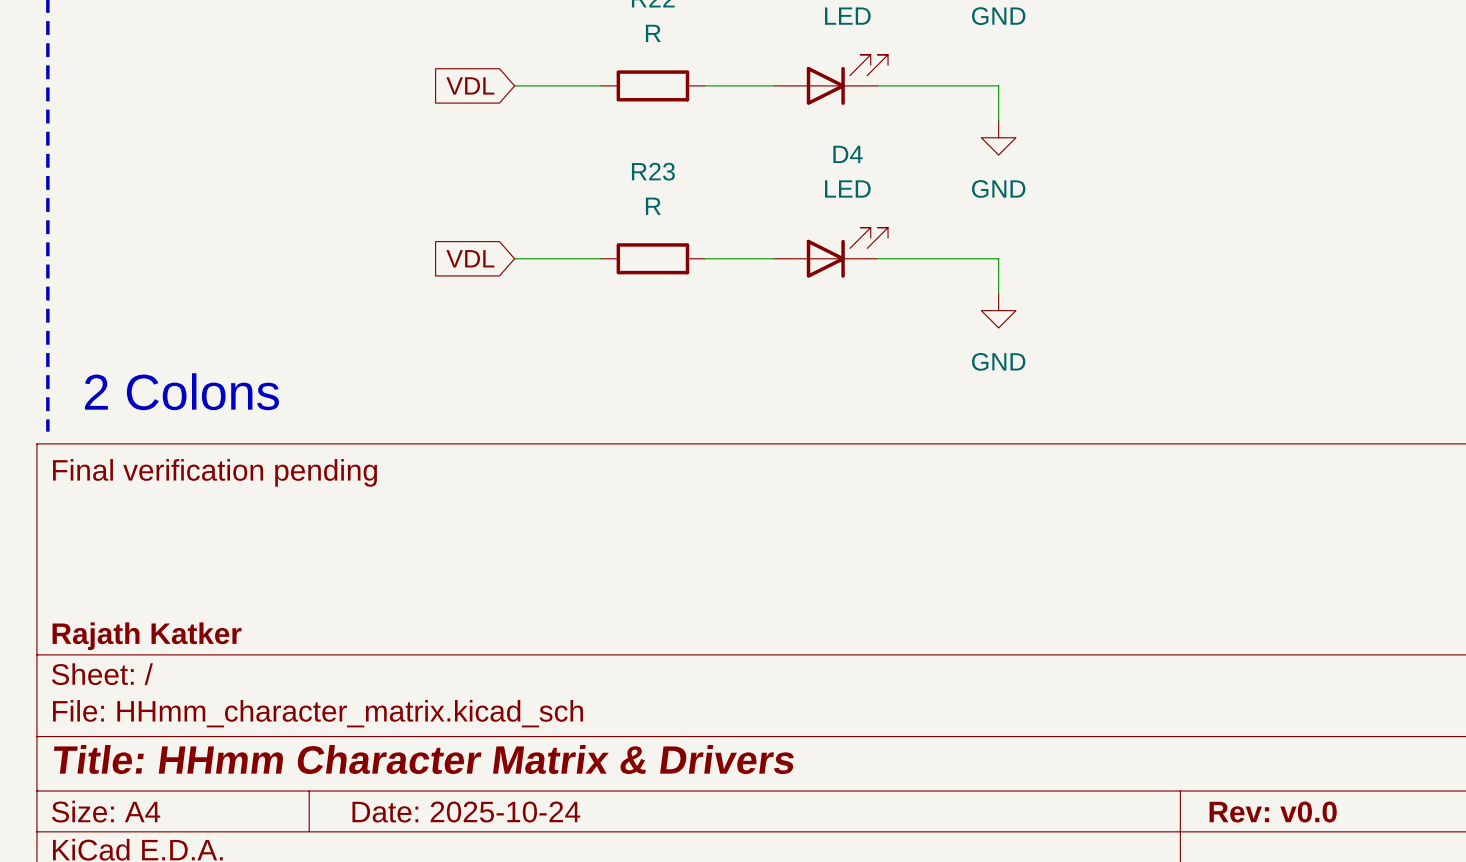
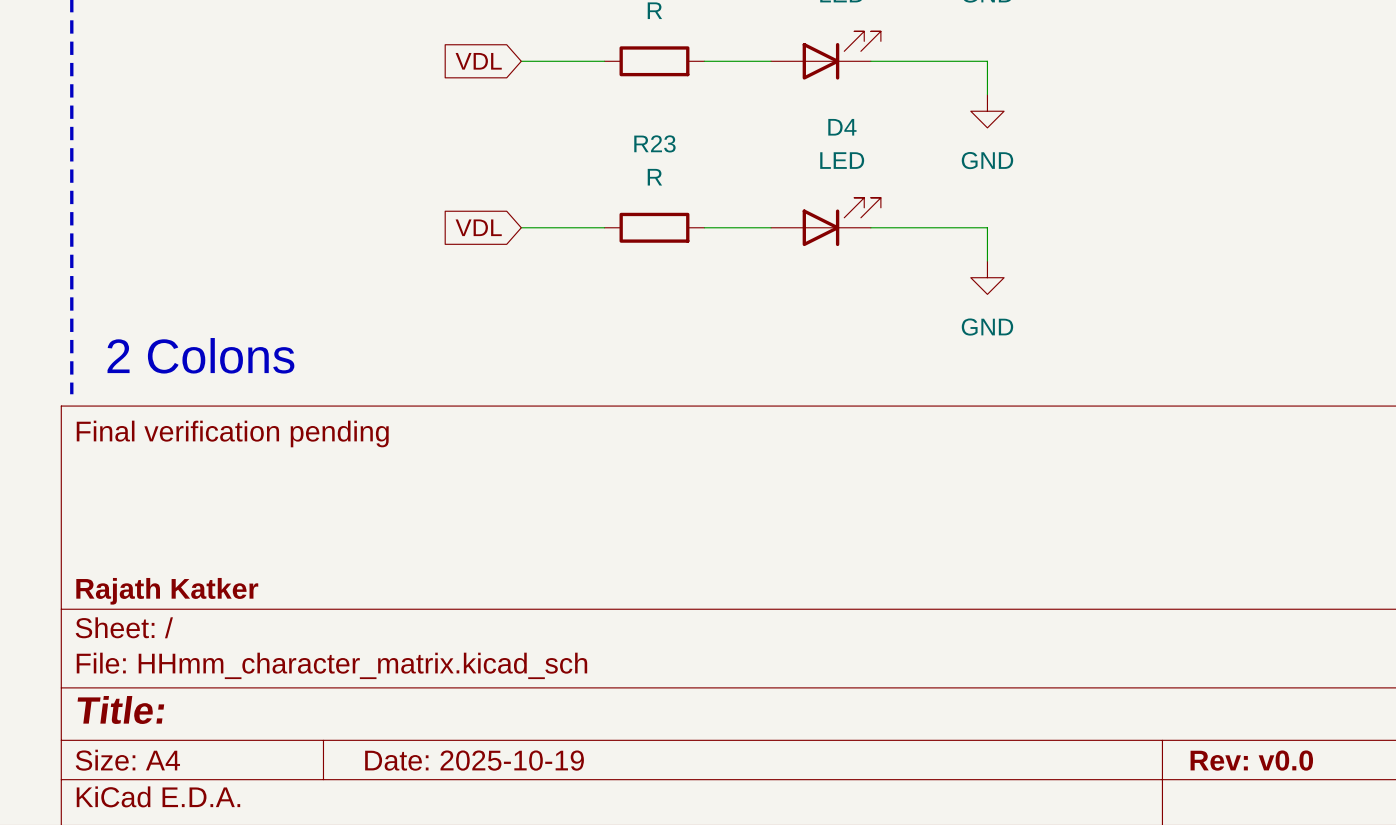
title block: Title: HHmm Character Matrix & Drivers (423, 759) -> Title: (120, 710)
title block: Date: 2025-10-24 (466, 812) -> Date: 2025-10-19 (474, 760)

